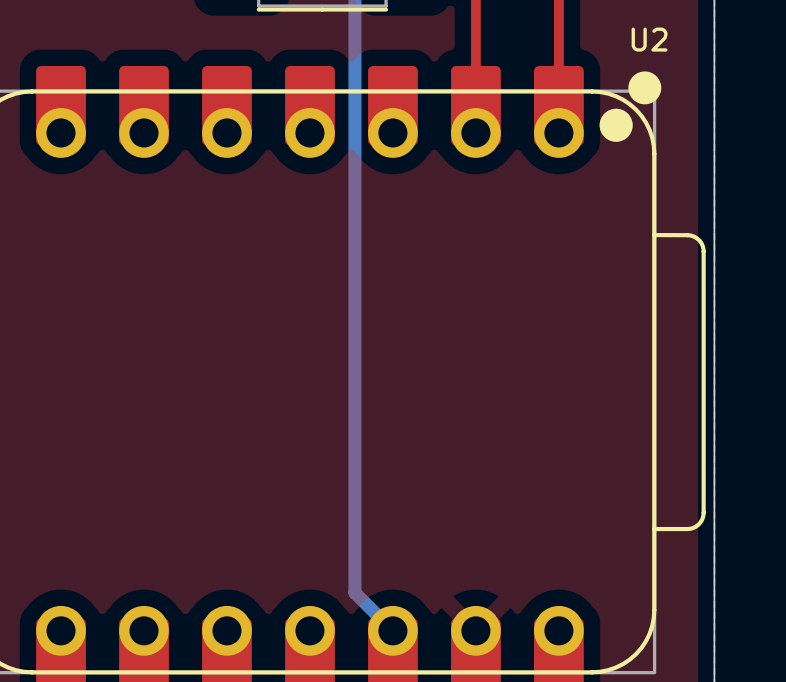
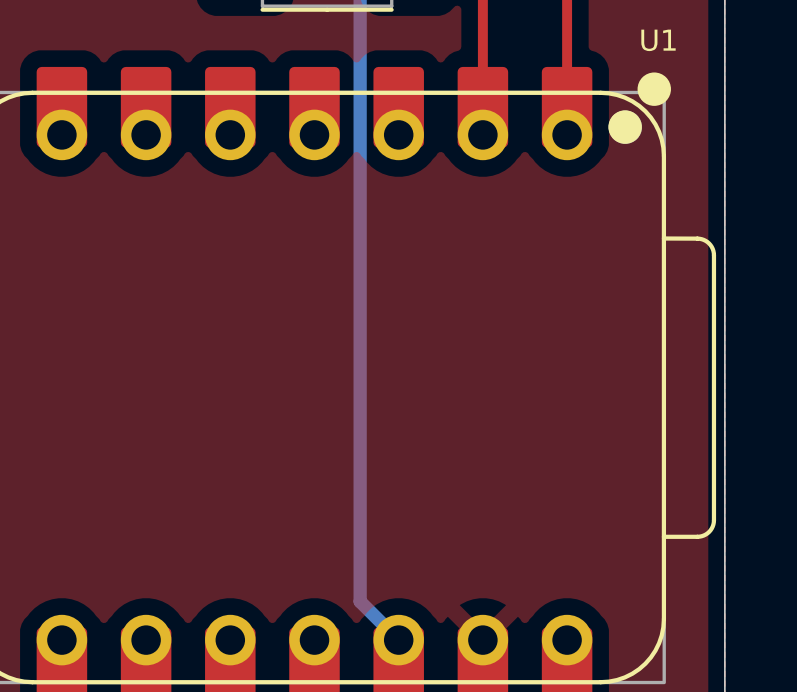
U2 name: U2 (649, 39) -> U1 (658, 40)

